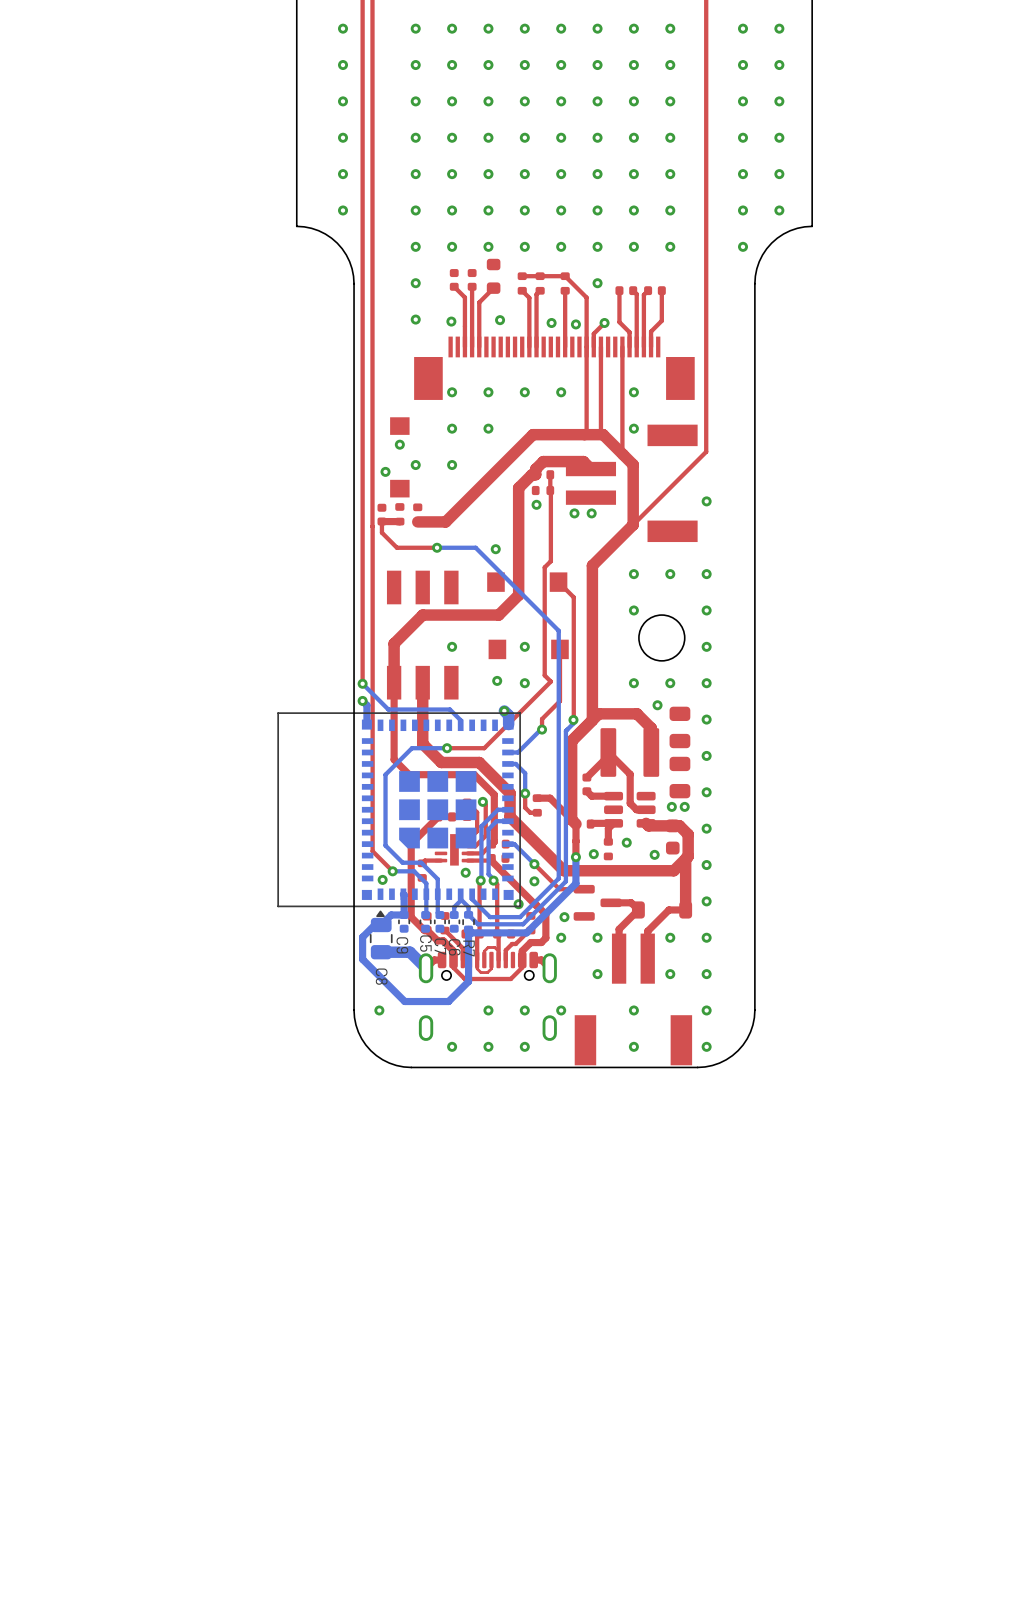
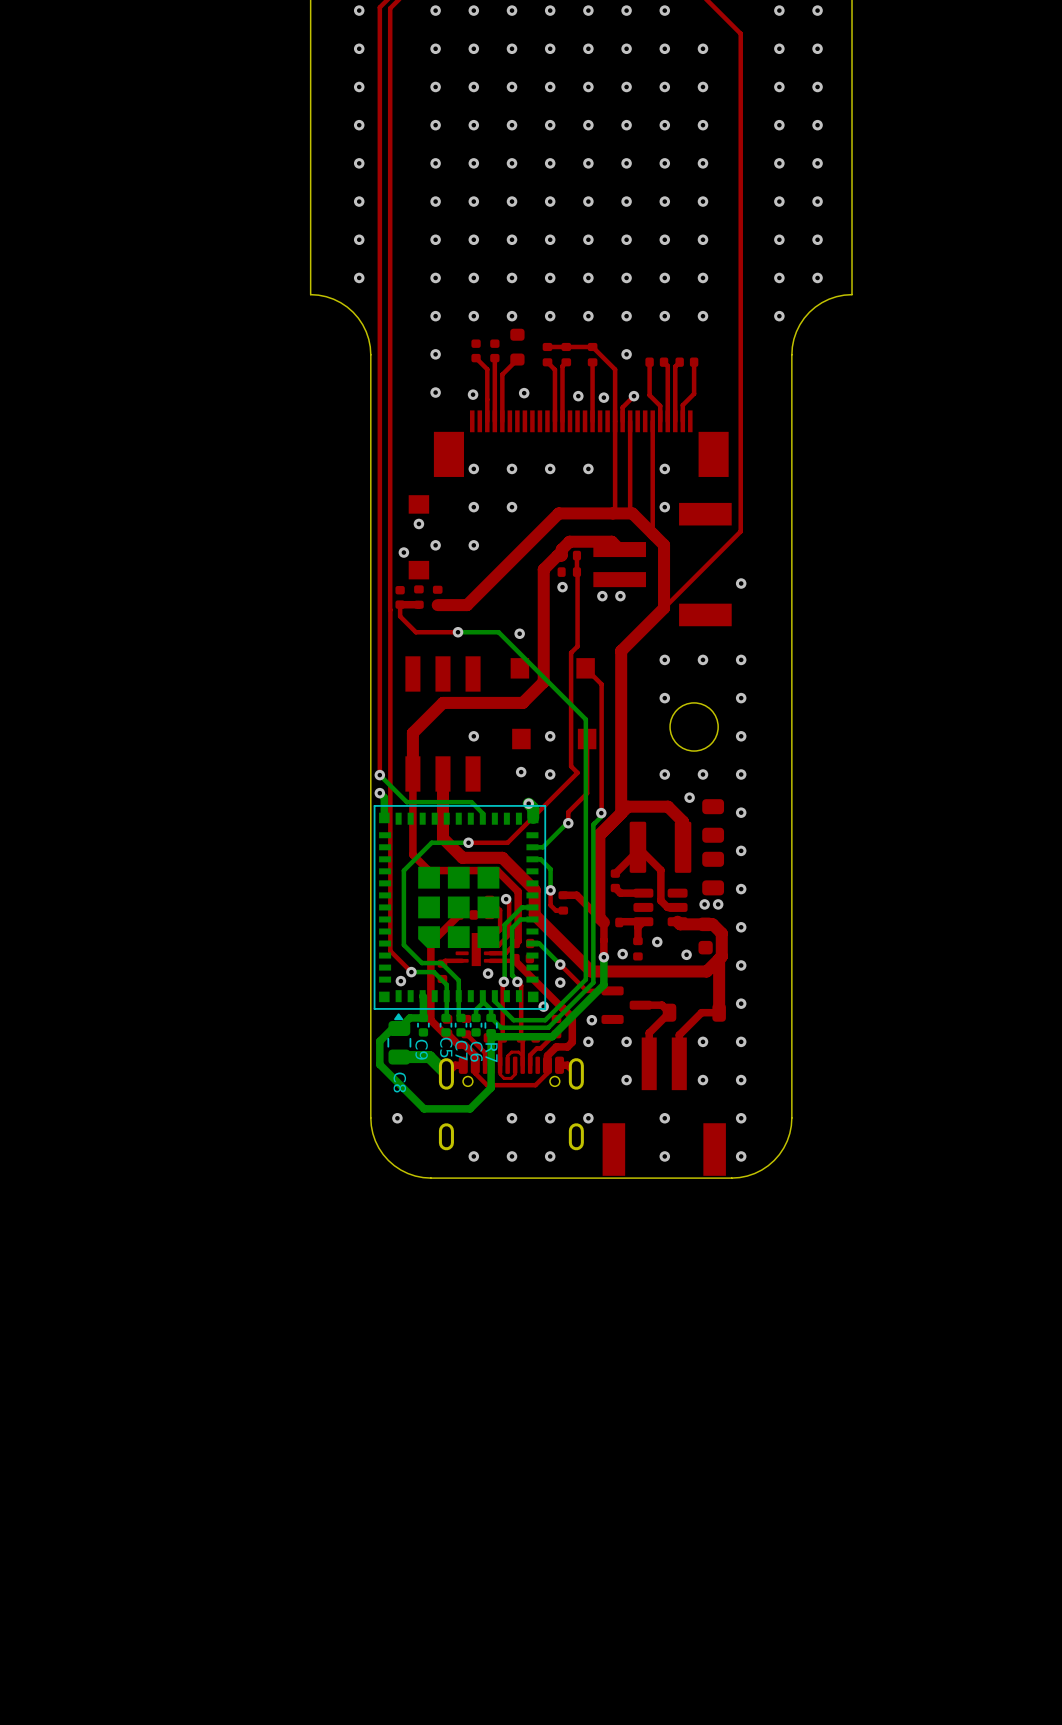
part: (399, 814) -> none
part: none -> (459, 912)

